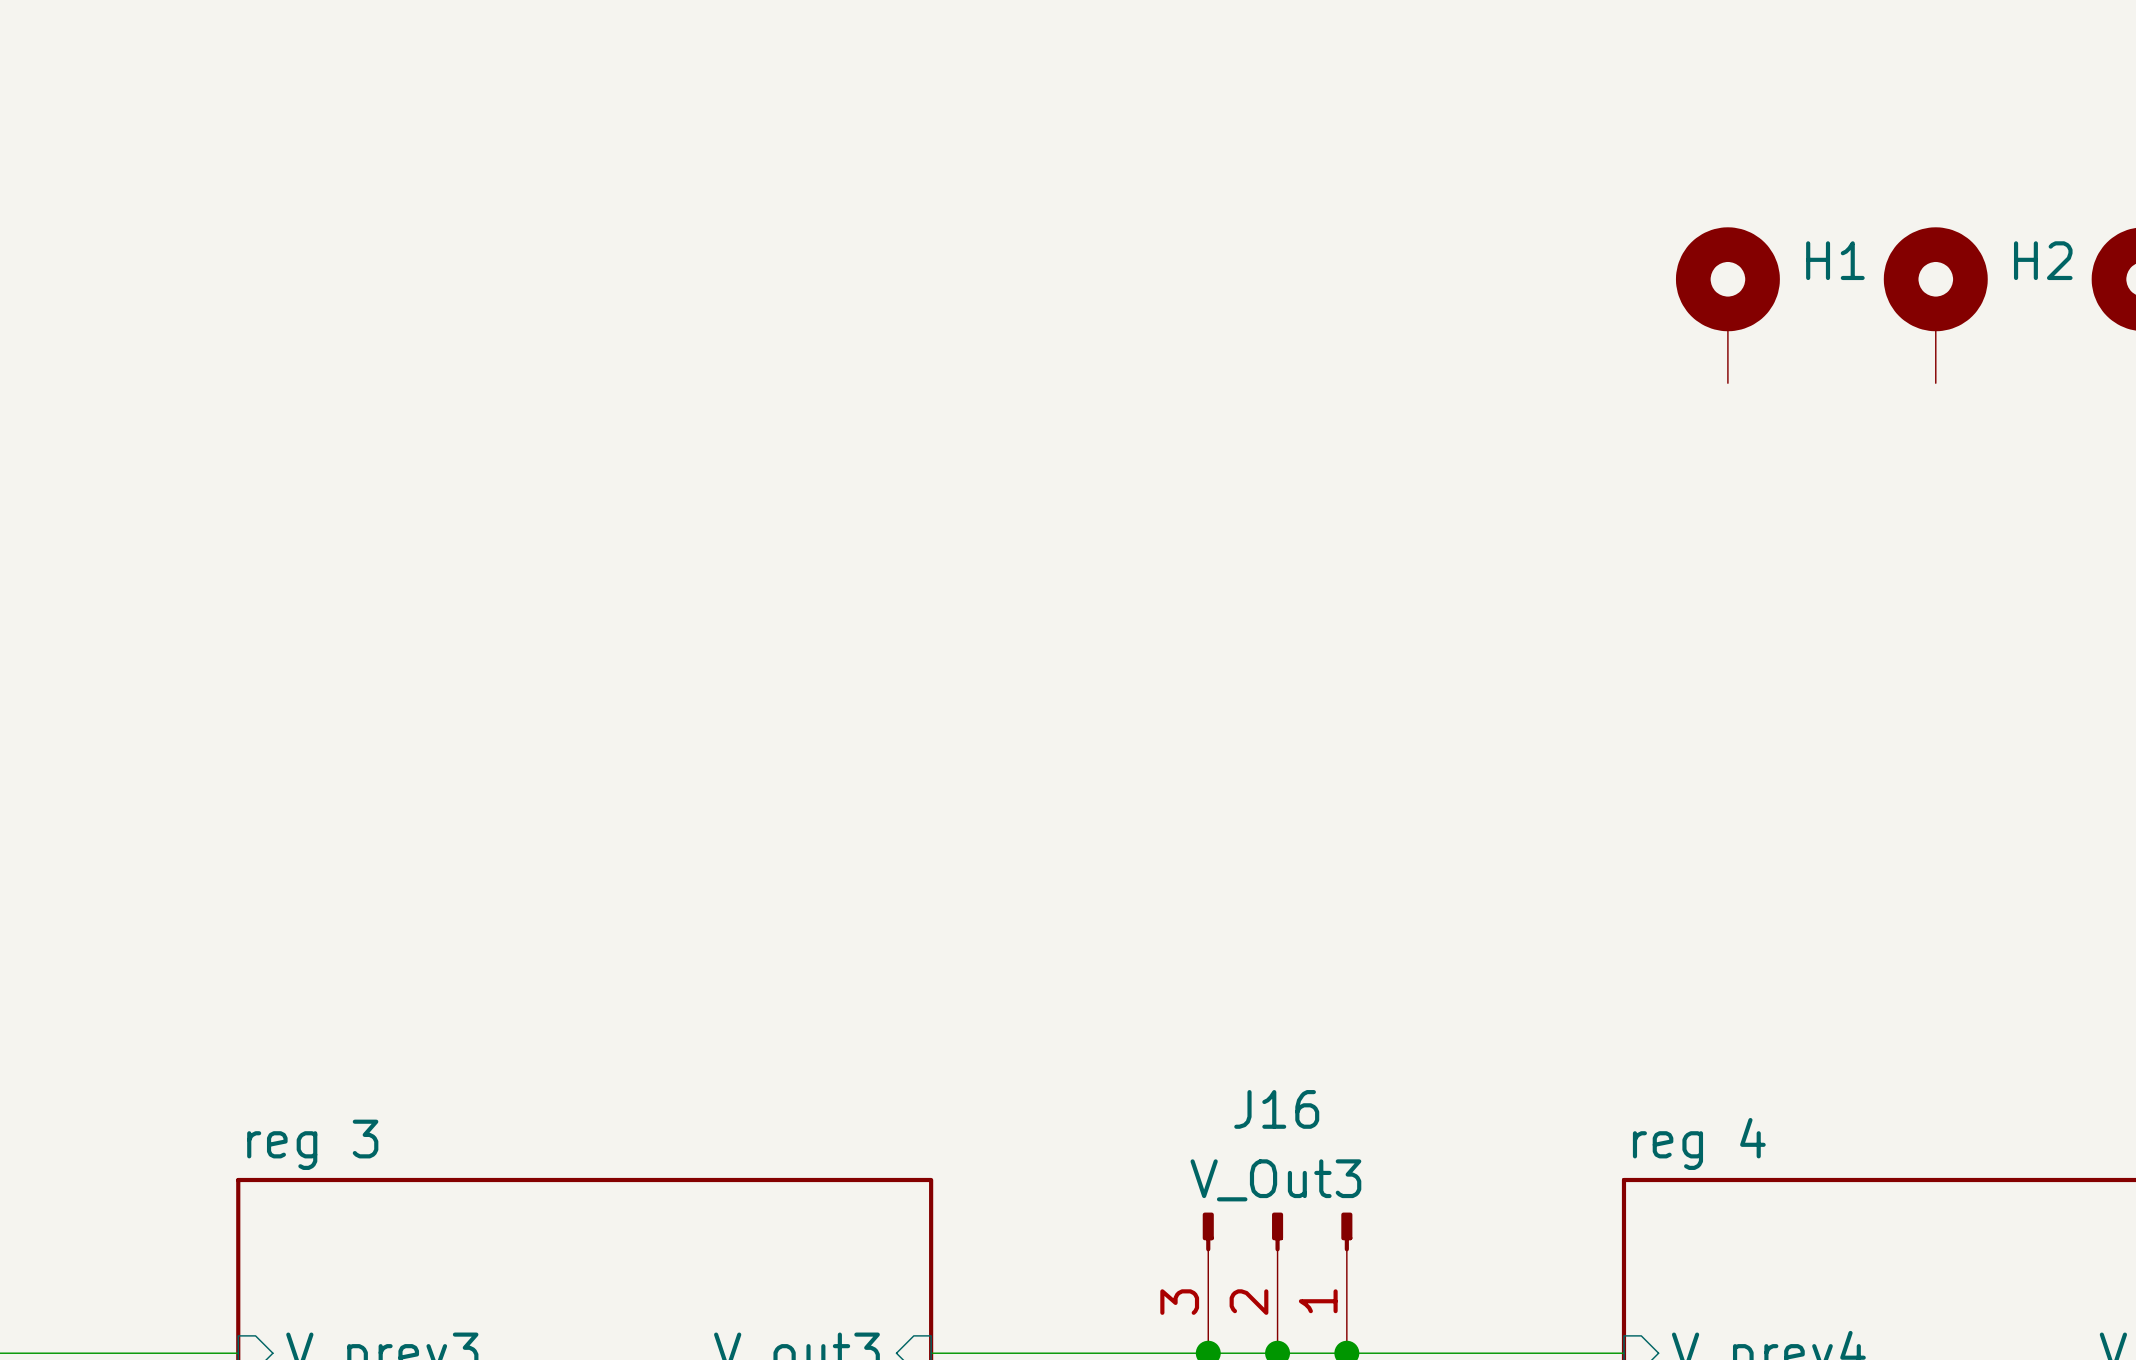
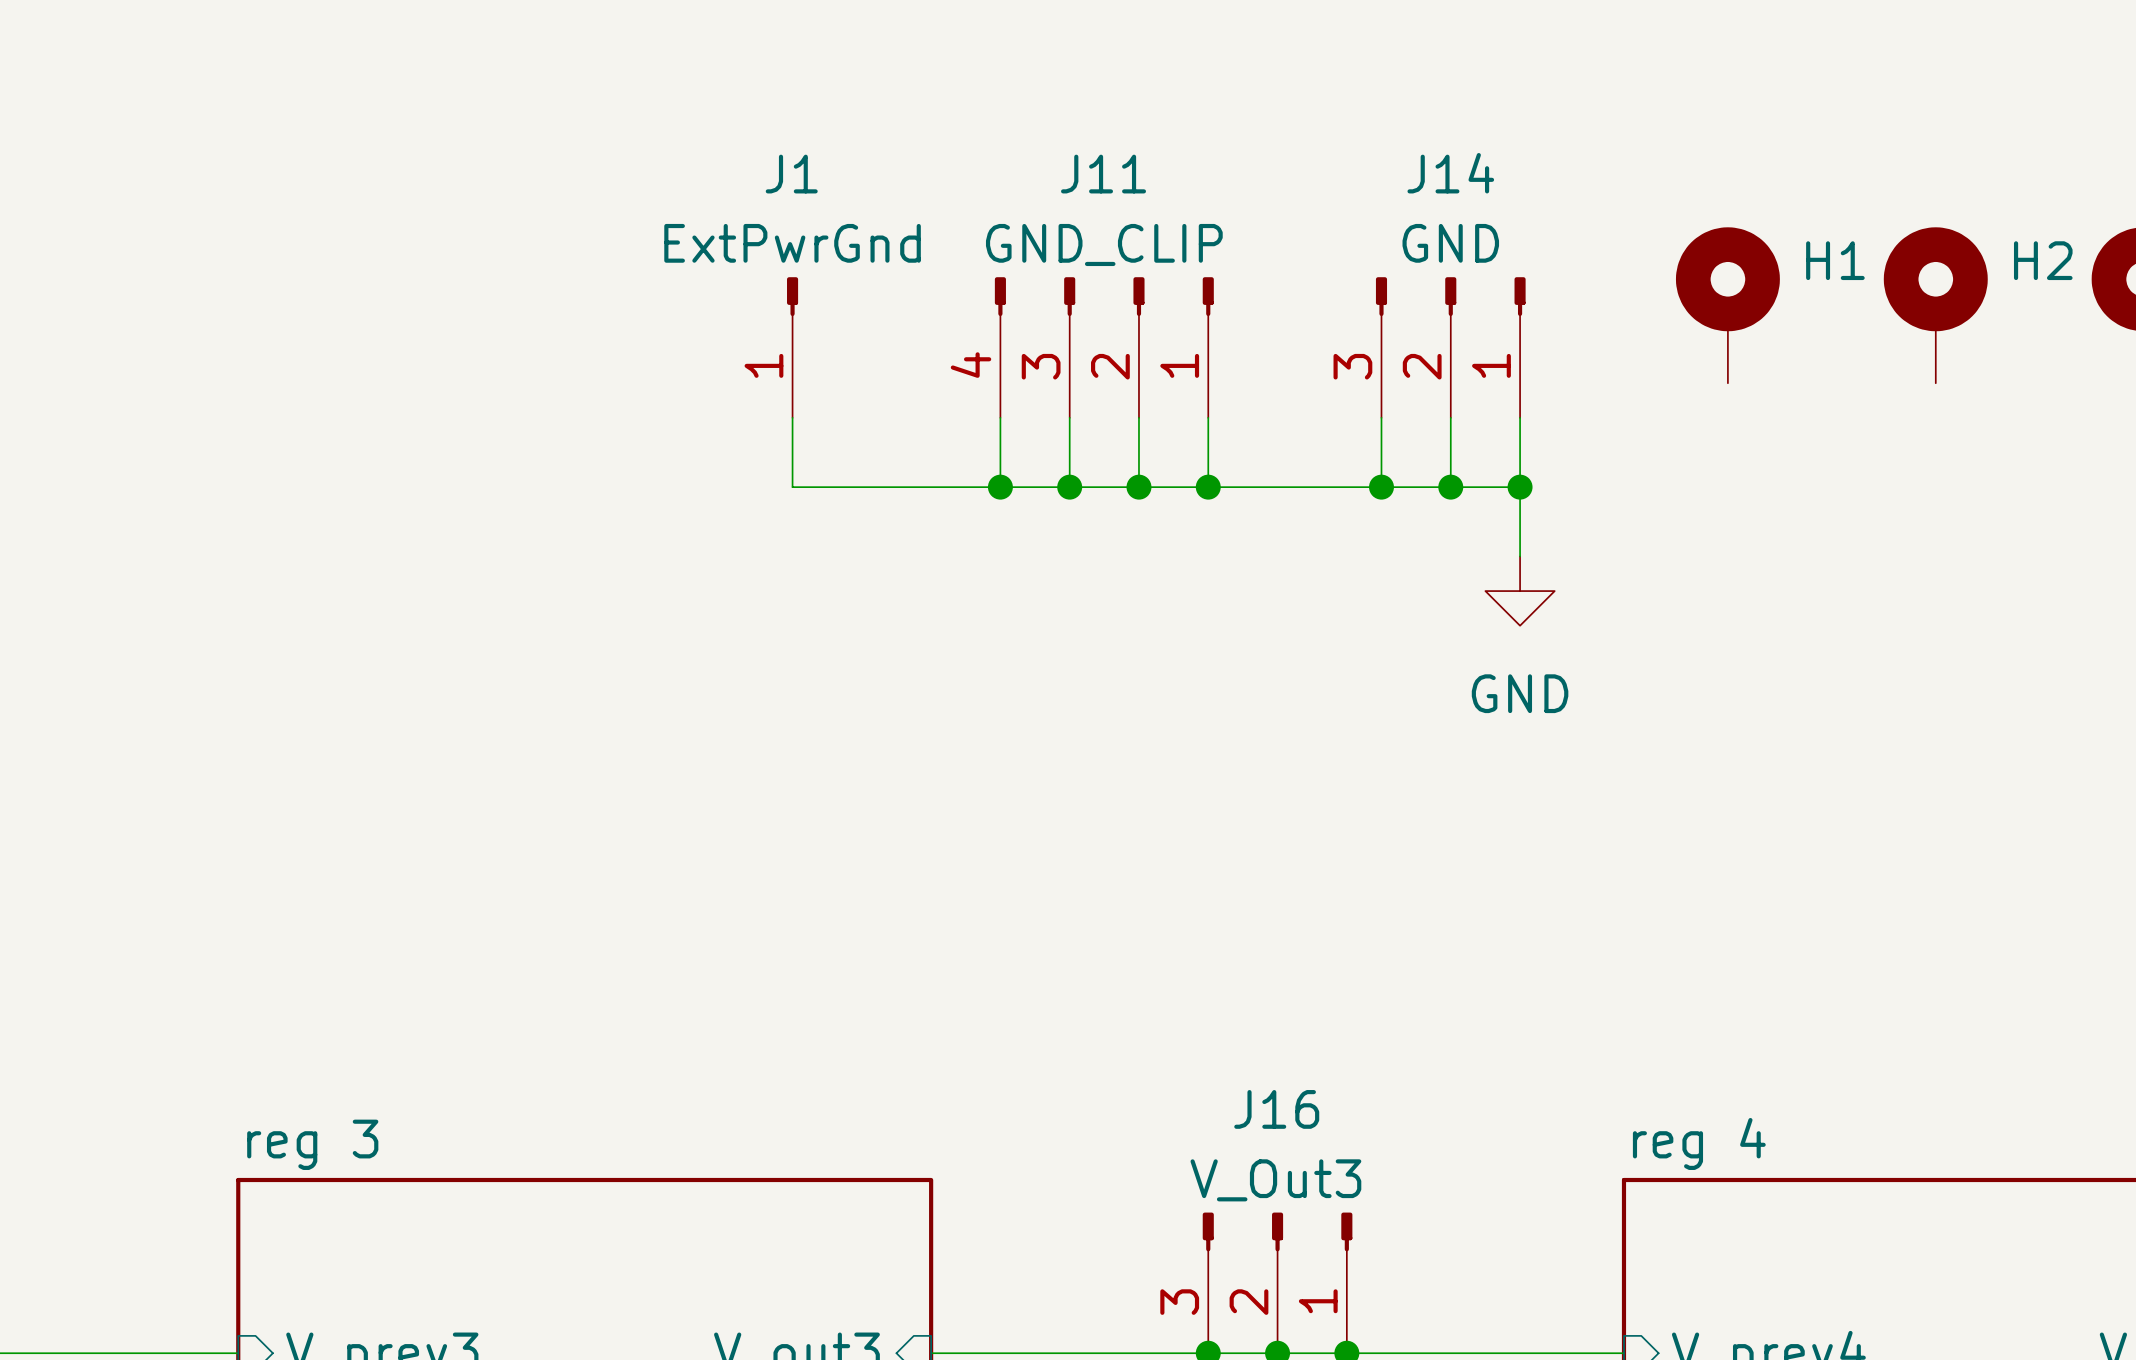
J1: none -> ExtPwrGnd (792, 347)
J11: none -> GND_CLIP (1104, 347)
J14: none -> GND (1450, 347)
wire: none -> (792, 417) (792, 487) (1520, 487)
wire: none -> (1000, 417) (1000, 487)
wire: none -> (1069, 417) (1069, 487)
wire: none -> (1138, 417) (1138, 487)
wire: none -> (1208, 417) (1208, 487)
wire: none -> (1381, 417) (1381, 487)
wire: none -> (1450, 417) (1450, 487)
wire: none -> (1520, 417) (1520, 556)
junction: none -> (1000, 487)
junction: none -> (1069, 487)
junction: none -> (1138, 487)
junction: none -> (1208, 487)
junction: none -> (1381, 487)
junction: none -> (1450, 487)
junction: none -> (1520, 487)
power symbol: none -> GND (1520, 591)

